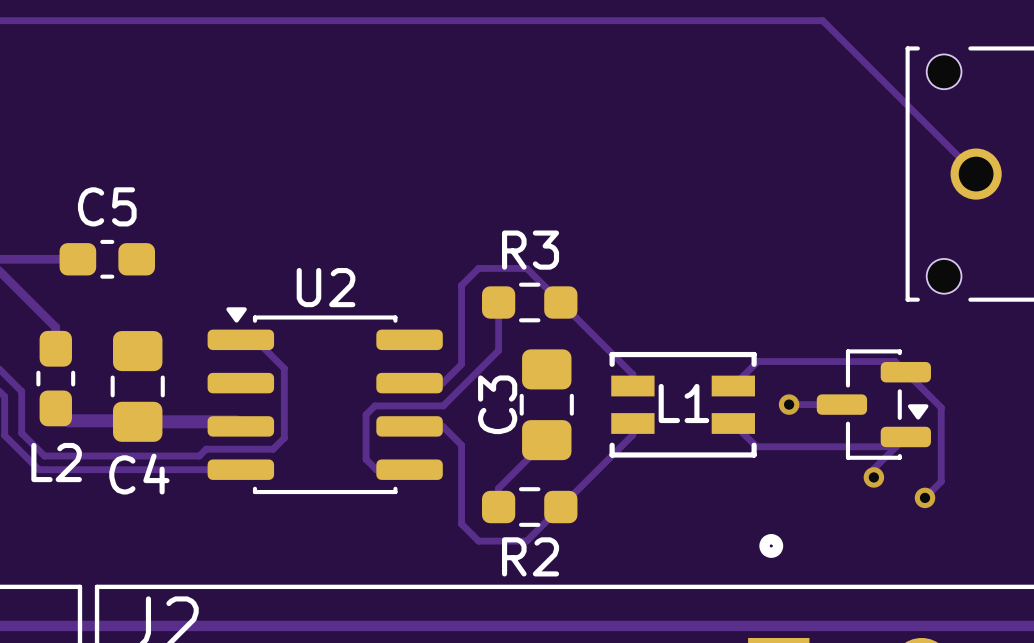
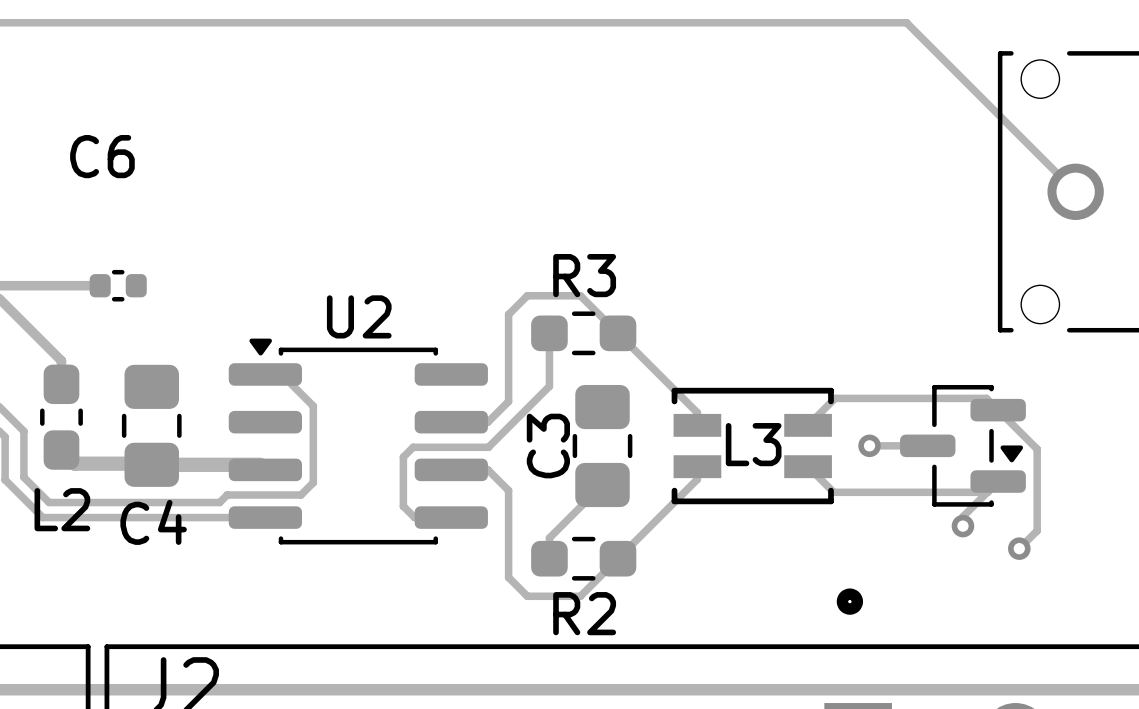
C5: (107, 259) -> none
C6: none -> (118, 285)
L1 name: L1 (683, 403) -> L3 (753, 444)

